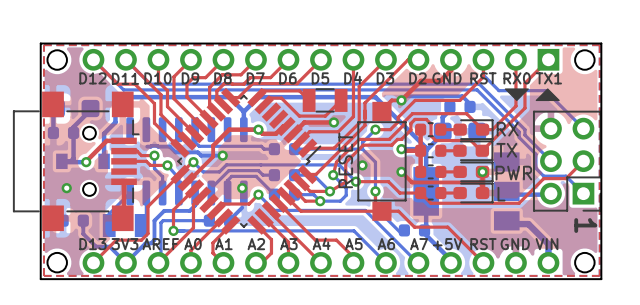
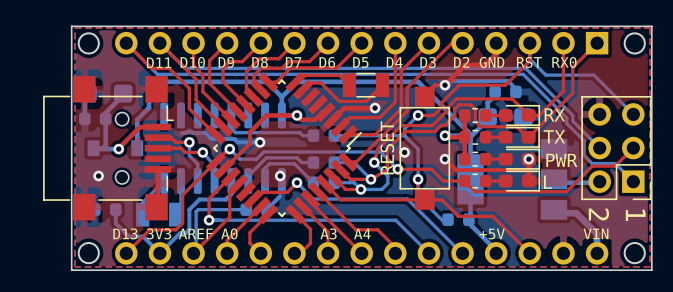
text: D12 (92, 78) -> none
text: TX1 (548, 78) -> none
drawing: [504, 88, 560, 102] -> none
text: none -> 2 (598, 214)
text: A1 (223, 244) -> none
text: A2 (256, 244) -> none
text: A5 (353, 244) -> none
text: A6 (386, 244) -> none
text: A7 (419, 244) -> none
text: RST (483, 244) -> none
text: GND (515, 244) -> none

